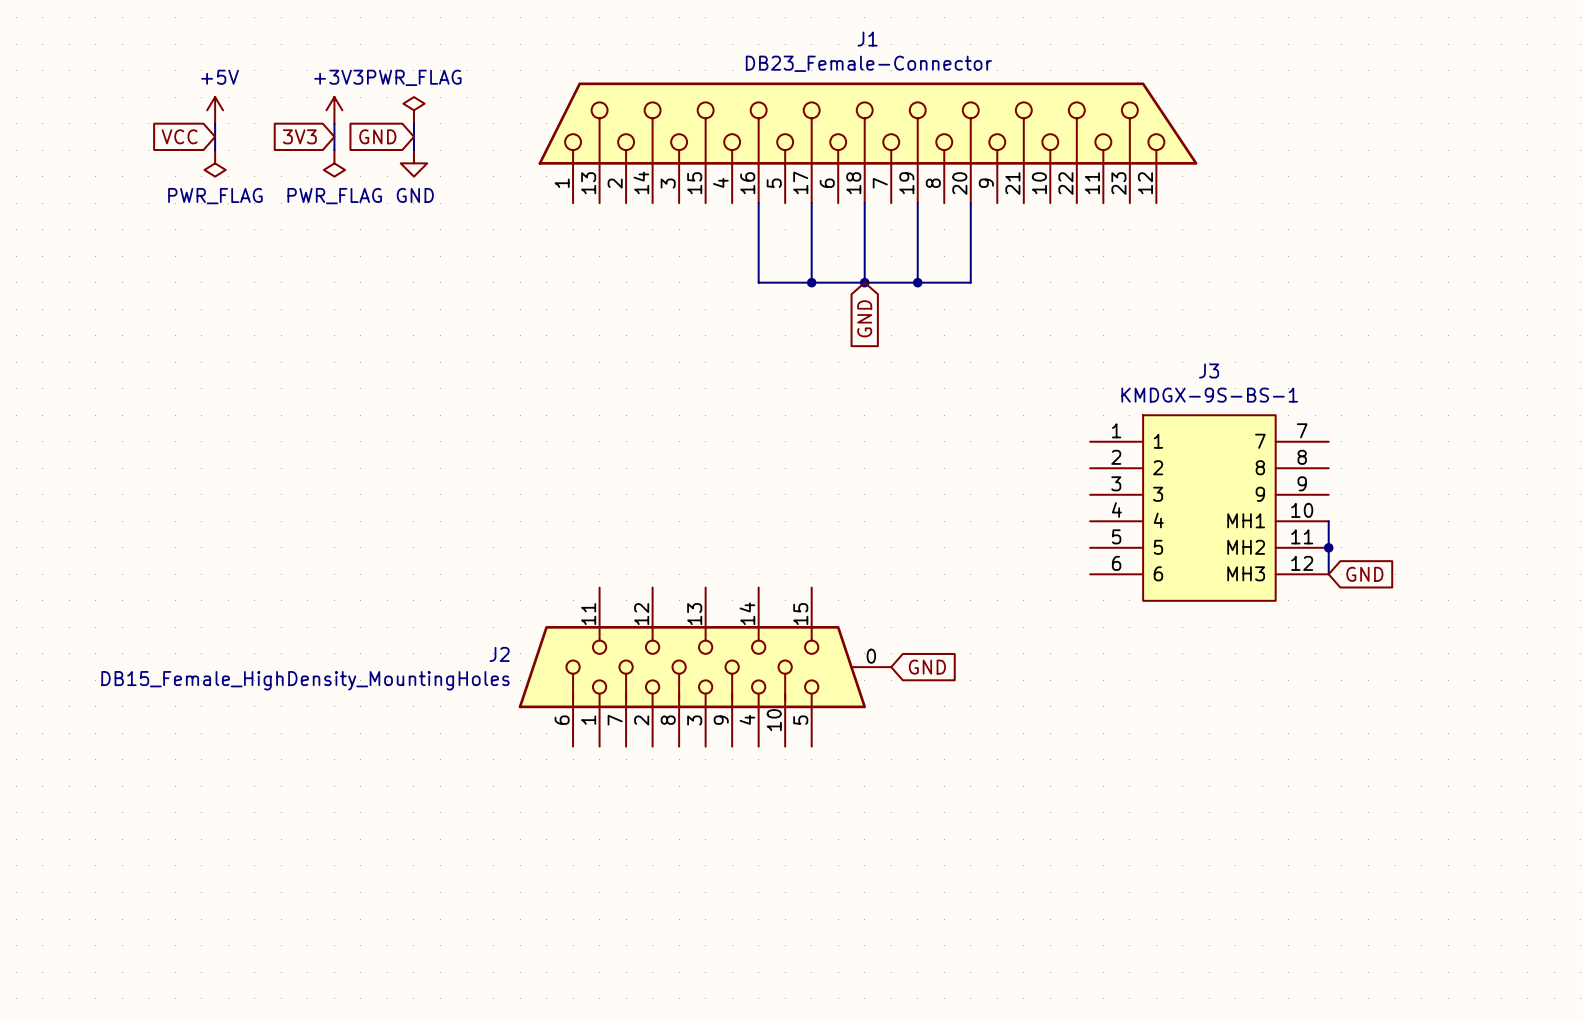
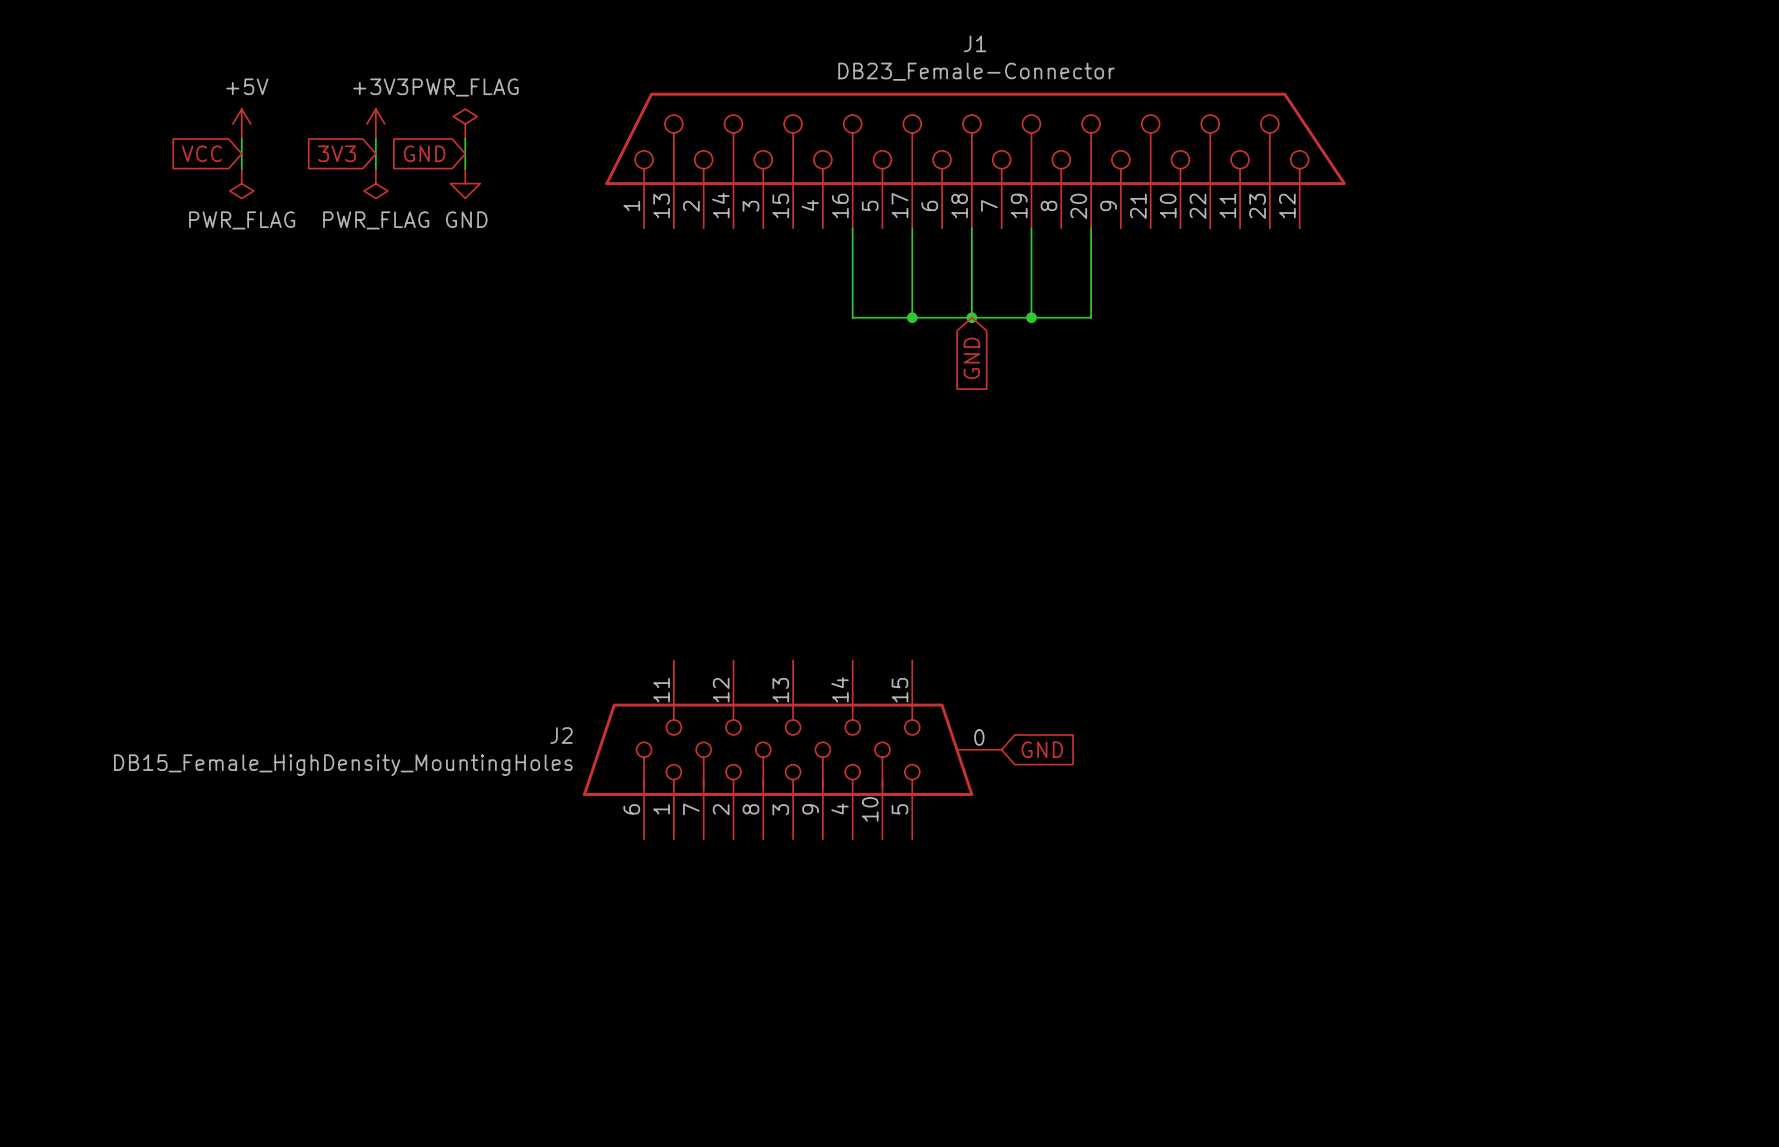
J3: KMDGX-9S-BS-1 (1209, 508) -> none
wire: (1328, 521) (1328, 574) -> none
junction: (1328, 547) -> none
global label: GND (1364, 574) -> none

